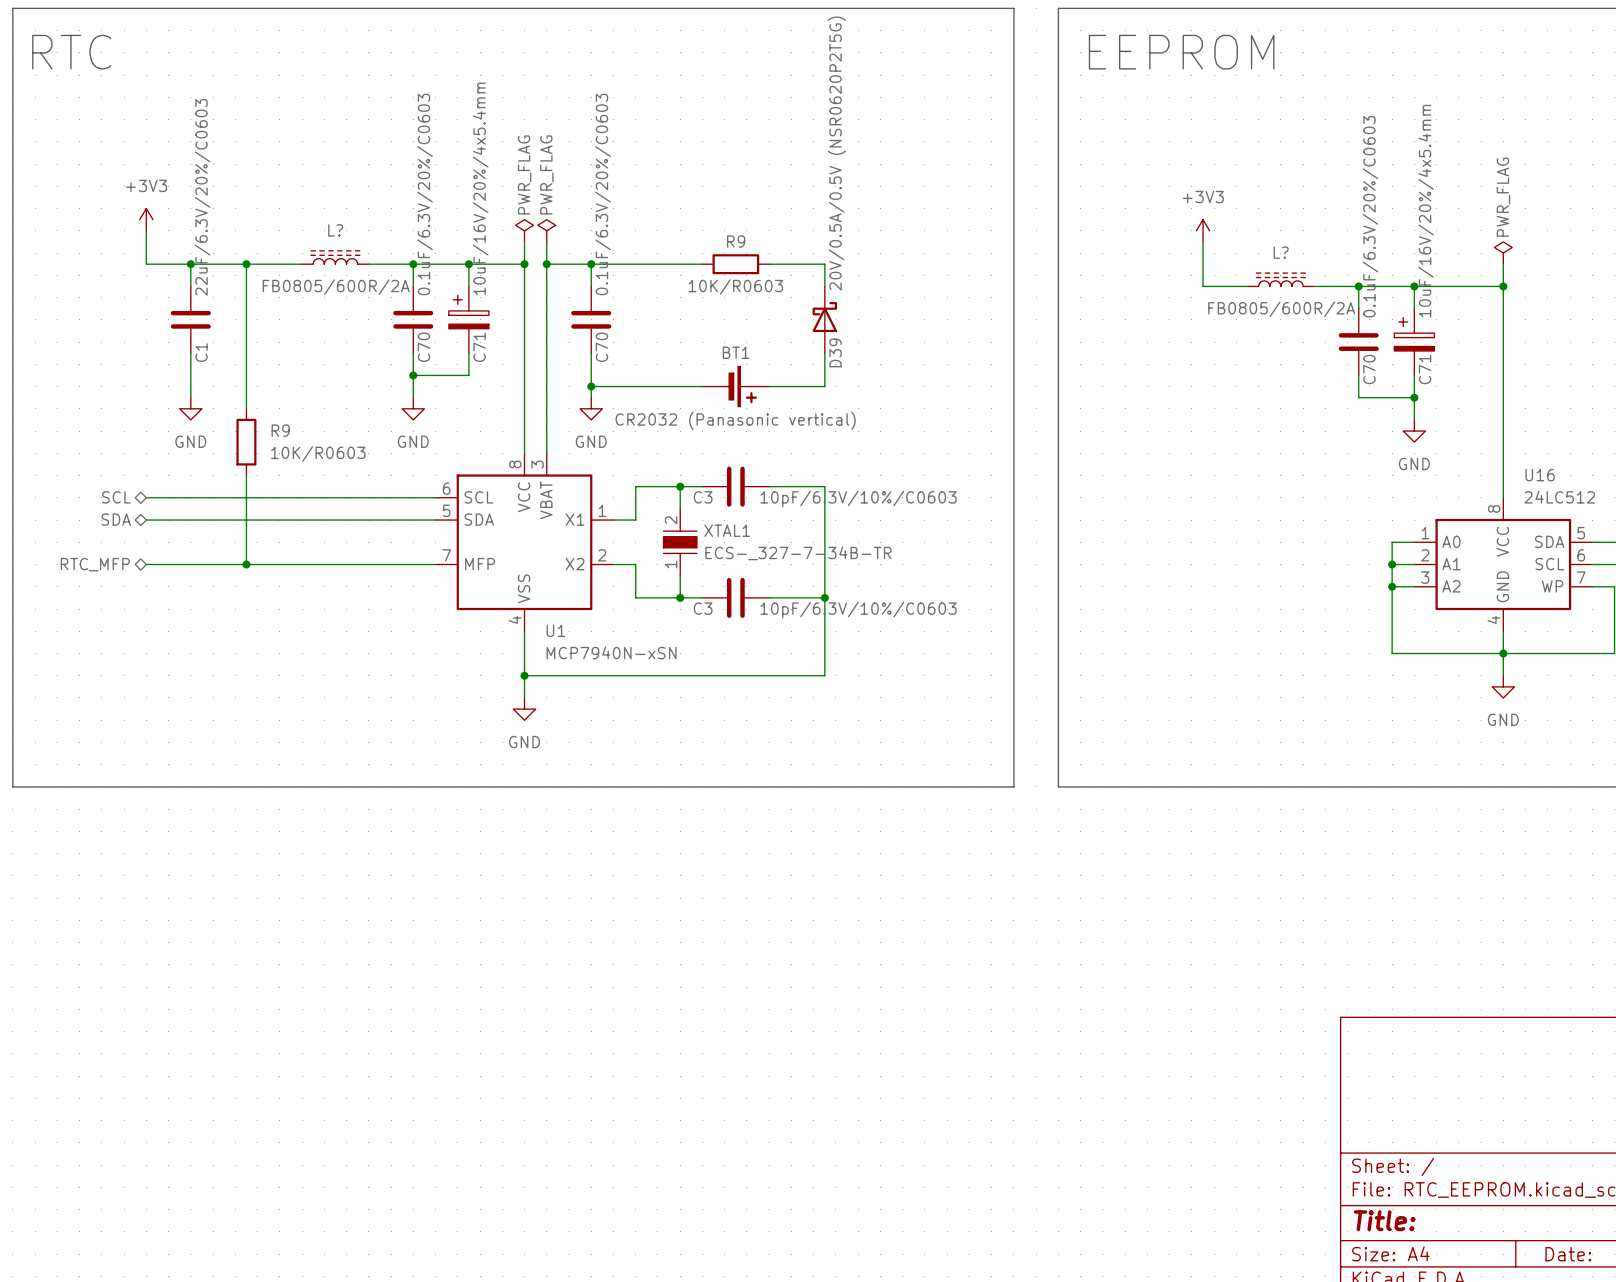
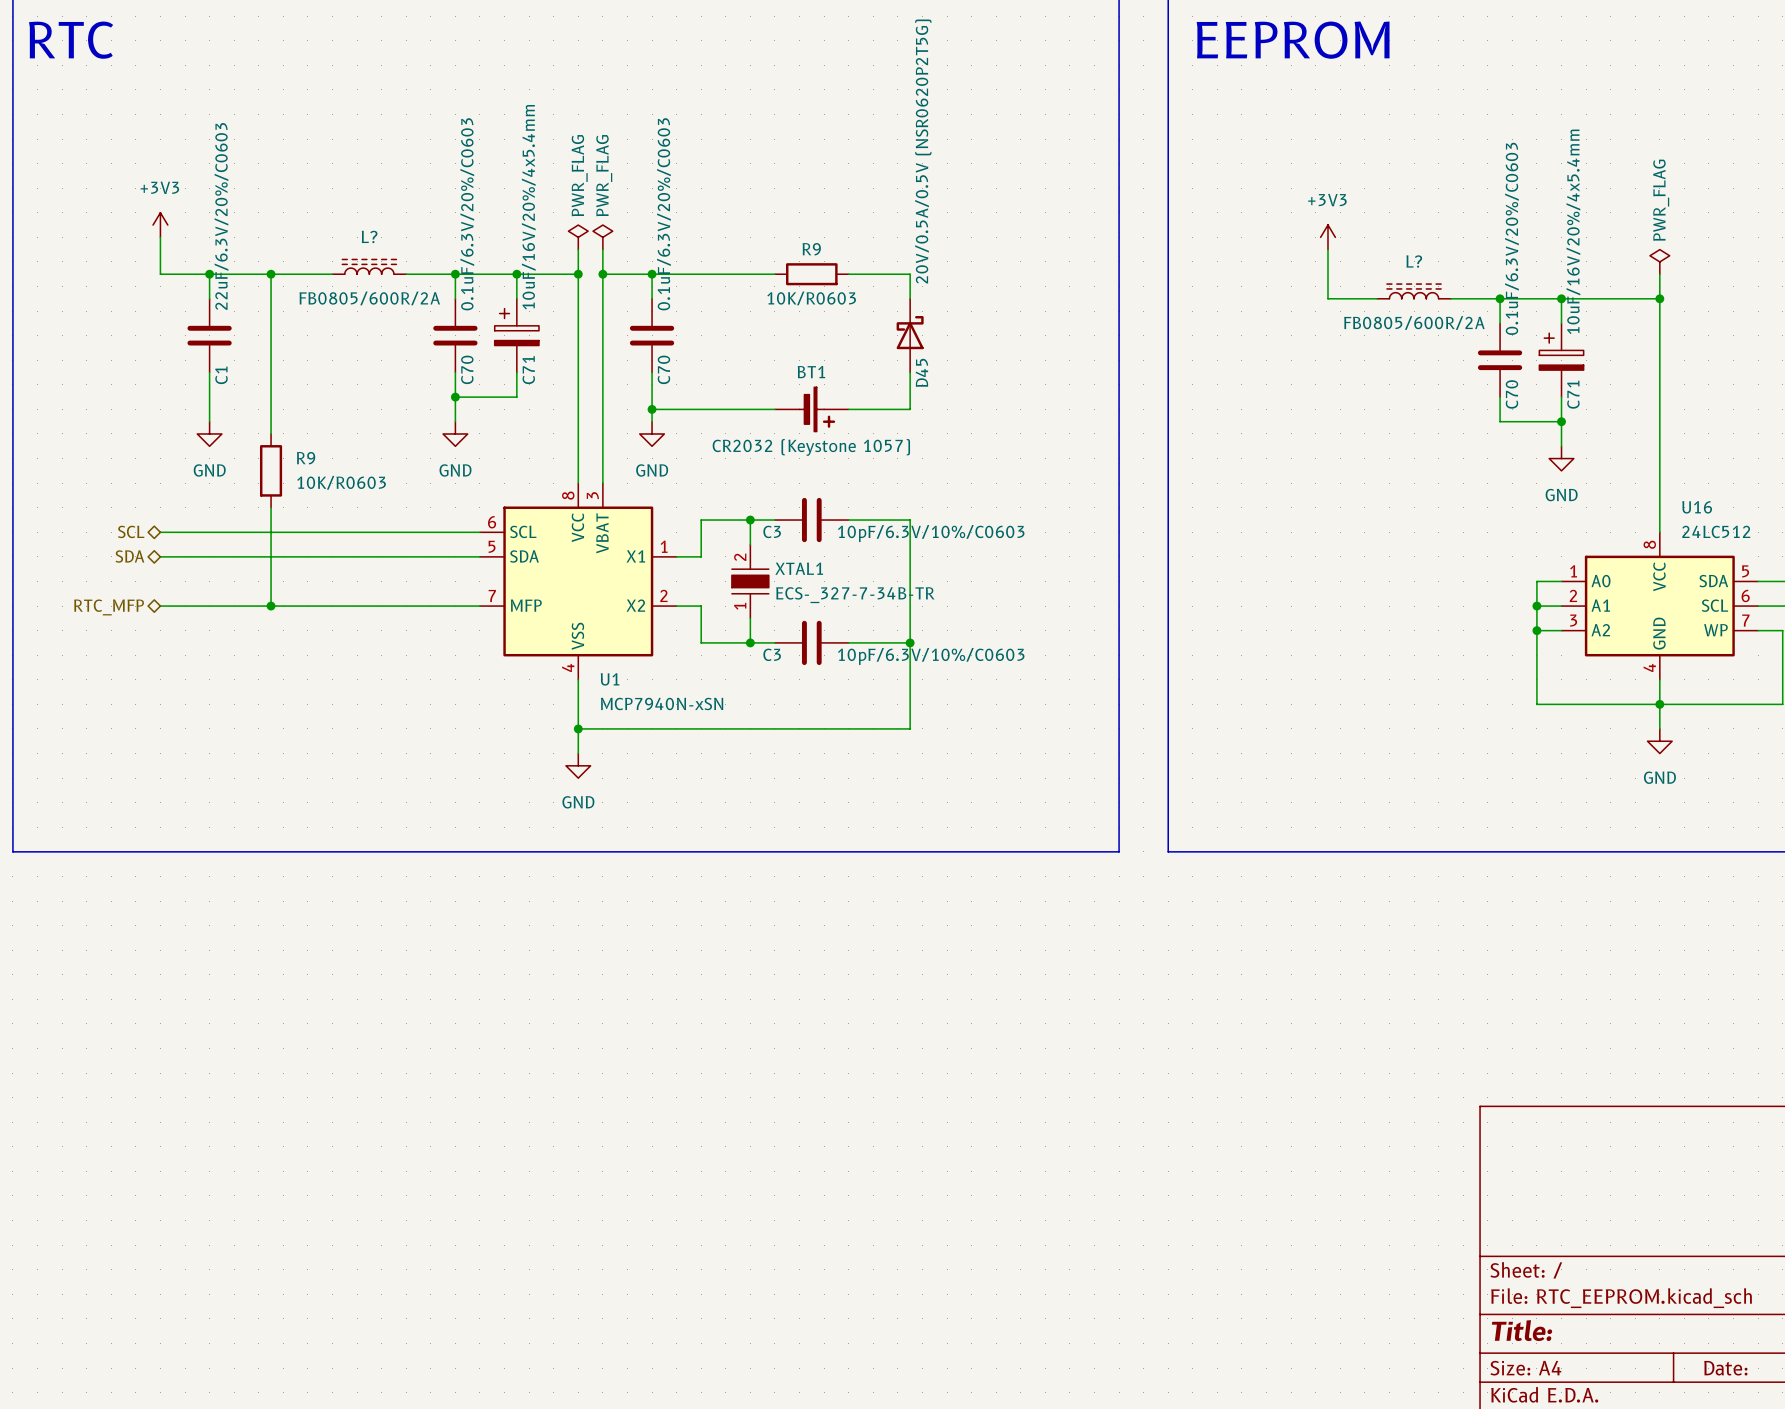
D39 name: D39 (835, 352) -> D45 (921, 372)
BT1 value: CR2032 (Panasonic vertical) (735, 420) -> CR2032 (Keystone 1057) (811, 447)

